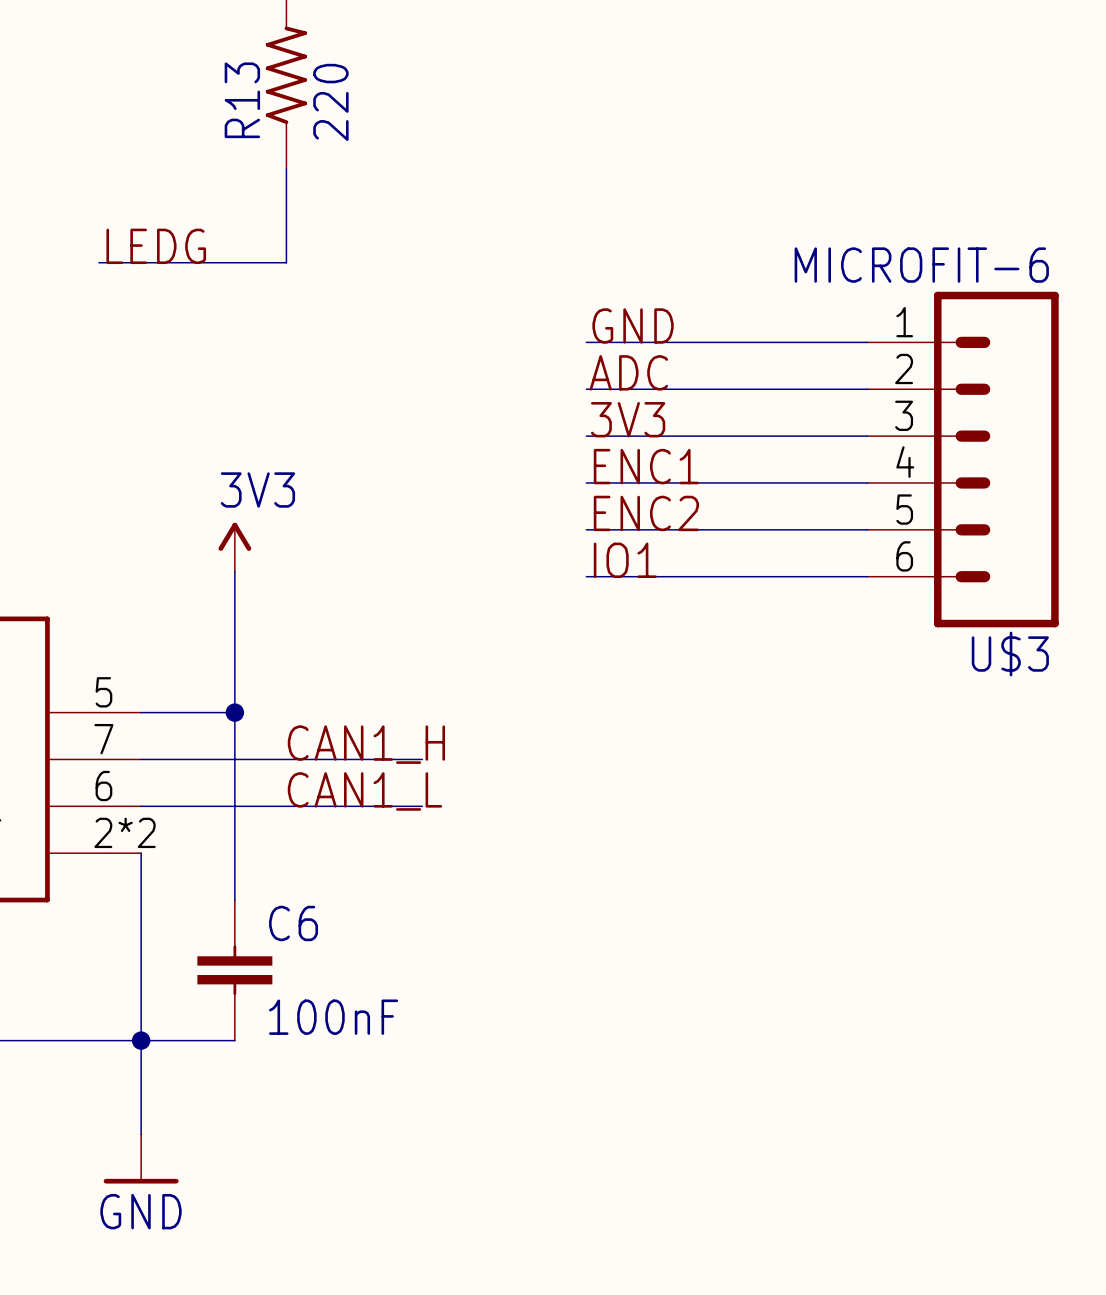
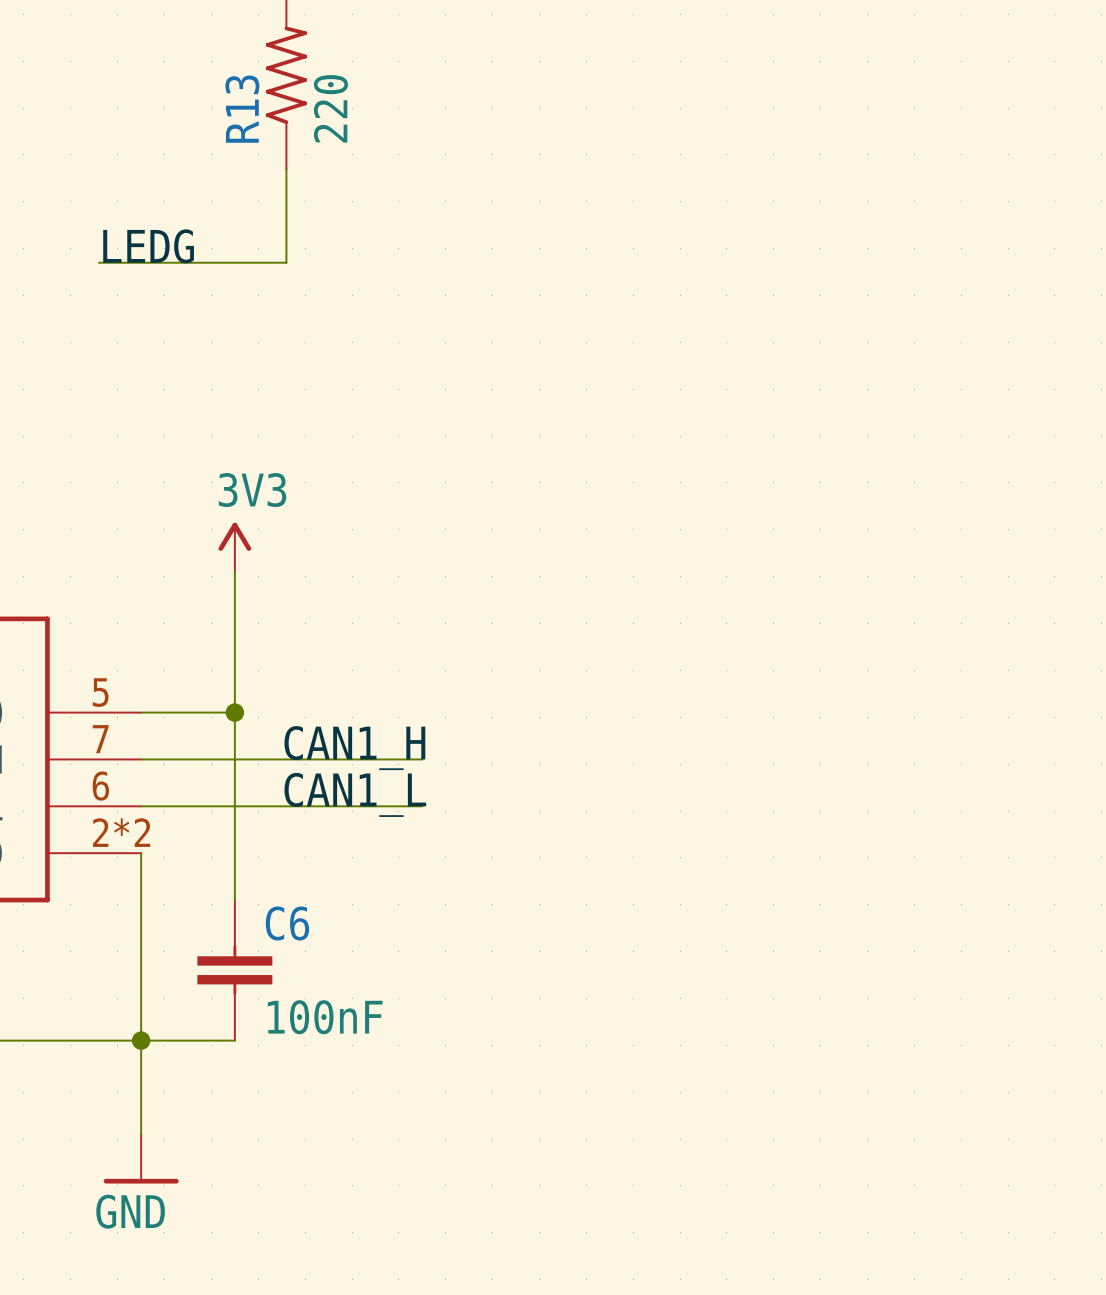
label: GND (633, 326) -> none
wire: (586, 342) (867, 342) -> none
label: ADC (628, 372) -> none
wire: (586, 389) (867, 389) -> none
label: 3V3 (628, 419) -> none
wire: (586, 436) (867, 436) -> none
U$3: MICROFIT-6 (963, 459) -> none
label: ENC1 (646, 466) -> none
wire: (586, 482) (867, 482) -> none
label: ENC2 (646, 513) -> none
wire: (586, 529) (867, 529) -> none
label: IO1 (625, 560) -> none
wire: (586, 576) (867, 576) -> none

